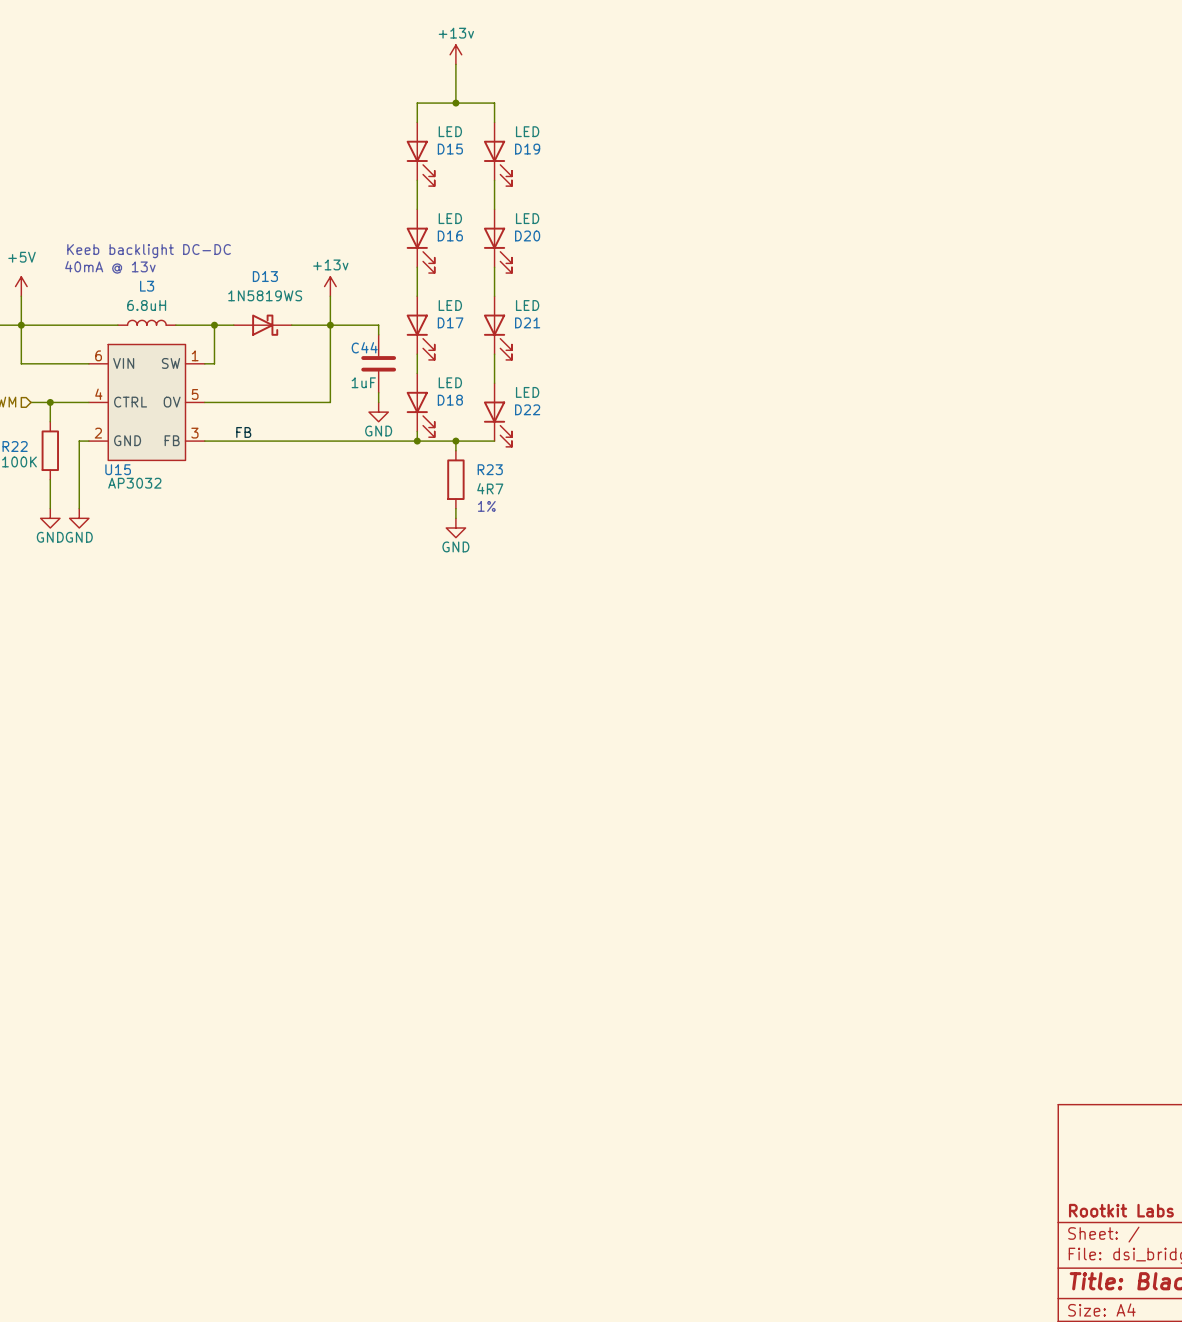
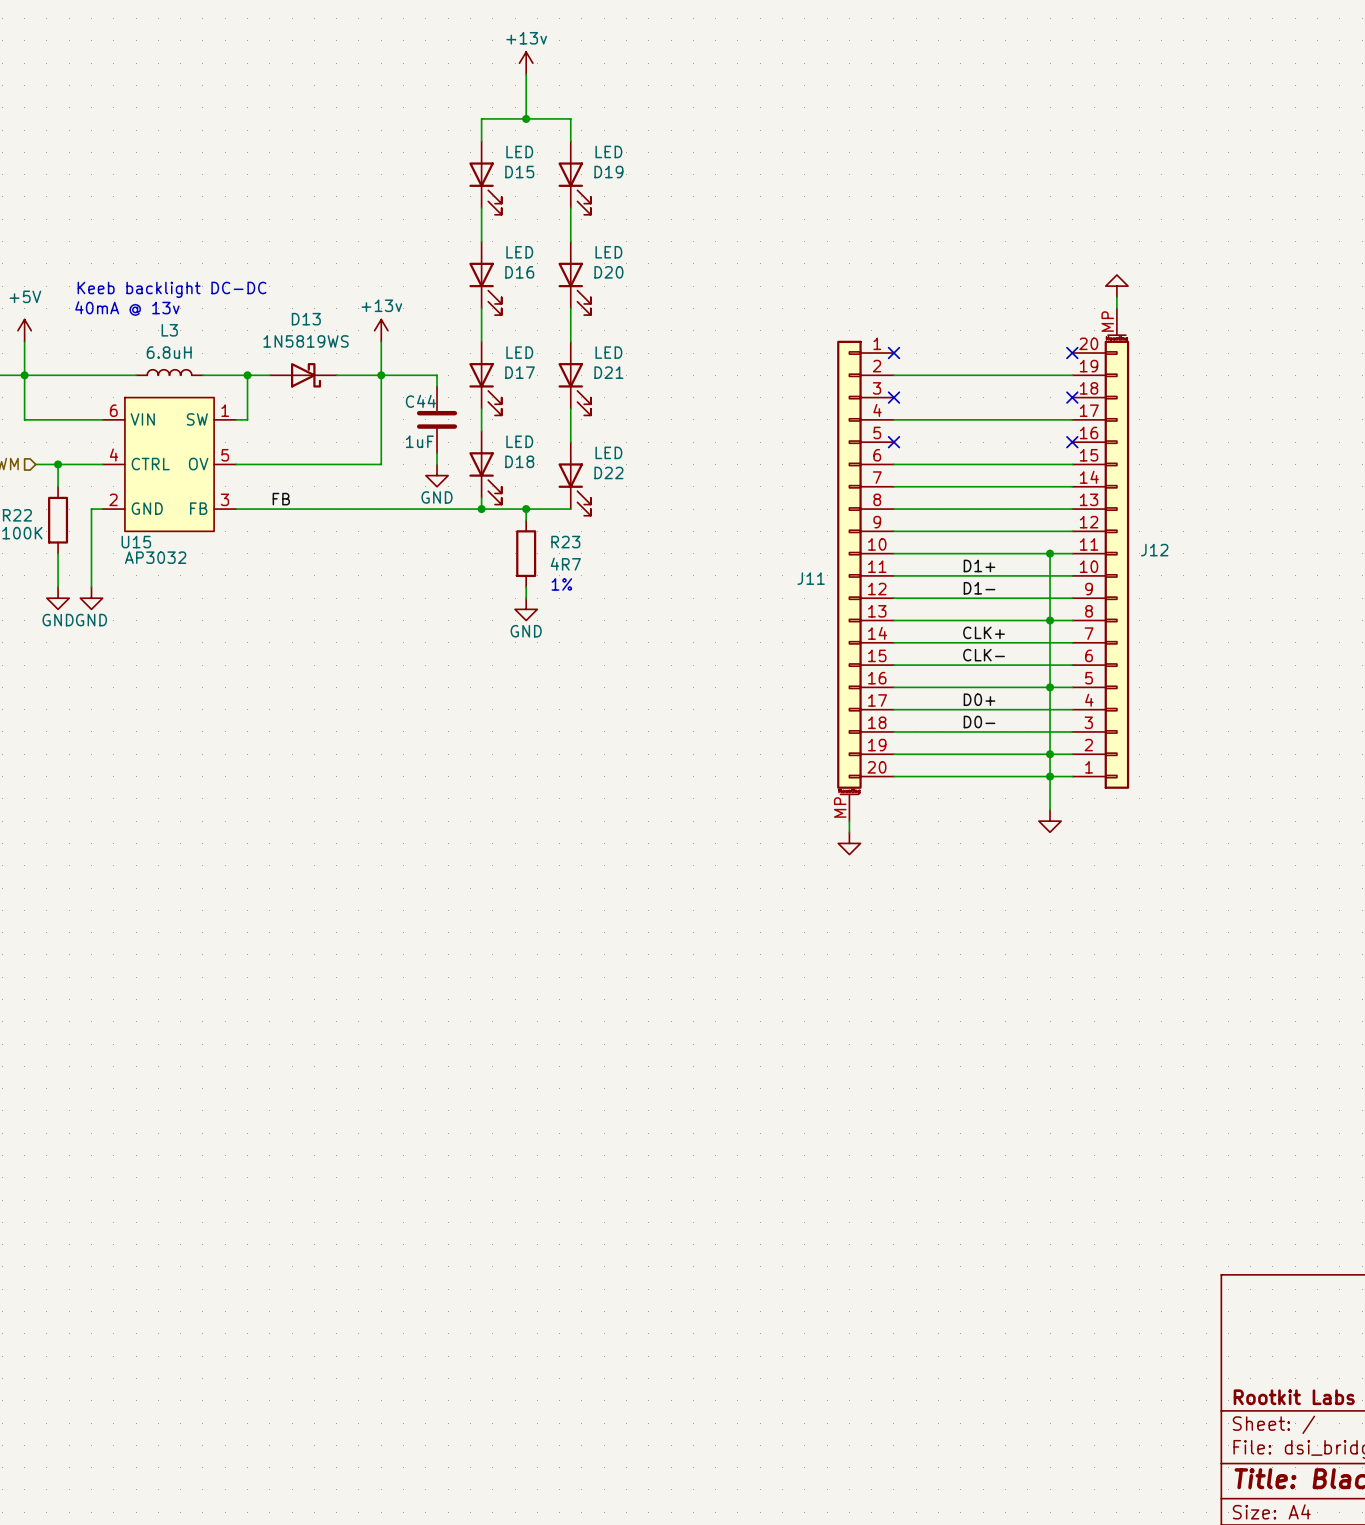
power symbol: none -> (1116, 286)
wire: none -> (1116, 297) (1116, 308)
no-connect mark: none -> (893, 353)
no-connect mark: none -> (1072, 353)
wire: none -> (893, 375) (1072, 375)
no-connect mark: none -> (893, 397)
no-connect mark: none -> (1072, 397)
wire: none -> (893, 419) (1072, 419)
no-connect mark: none -> (893, 442)
no-connect mark: none -> (1072, 442)
wire: none -> (893, 464) (1072, 464)
wire: none -> (893, 486) (1072, 486)
wire: none -> (893, 509) (1072, 509)
wire: none -> (893, 531) (1072, 531)
J12: none -> (1100, 548)
wire: none -> (893, 553) (1072, 553)
wire: none -> (1050, 553) (1050, 809)
junction: none -> (1050, 553)
label: none -> D1+ (979, 565)
wire: none -> (893, 575) (1072, 575)
J11: none -> (865, 580)
label: none -> D1- (979, 588)
wire: none -> (893, 598) (1072, 598)
wire: none -> (893, 620) (1072, 620)
junction: none -> (1050, 620)
label: none -> CLK+ (984, 632)
wire: none -> (893, 642) (1072, 642)
label: none -> CLK- (984, 655)
wire: none -> (893, 665) (1072, 665)
wire: none -> (893, 687) (1072, 687)
junction: none -> (1050, 687)
label: none -> D0+ (979, 699)
wire: none -> (893, 709) (1072, 709)
label: none -> D0- (979, 722)
wire: none -> (893, 731) (1072, 731)
wire: none -> (893, 754) (1072, 754)
junction: none -> (1050, 754)
wire: none -> (893, 776) (1072, 776)
junction: none -> (1050, 776)
wire: none -> (849, 821) (849, 832)
power symbol: none -> (1050, 821)
power symbol: none -> (849, 843)

